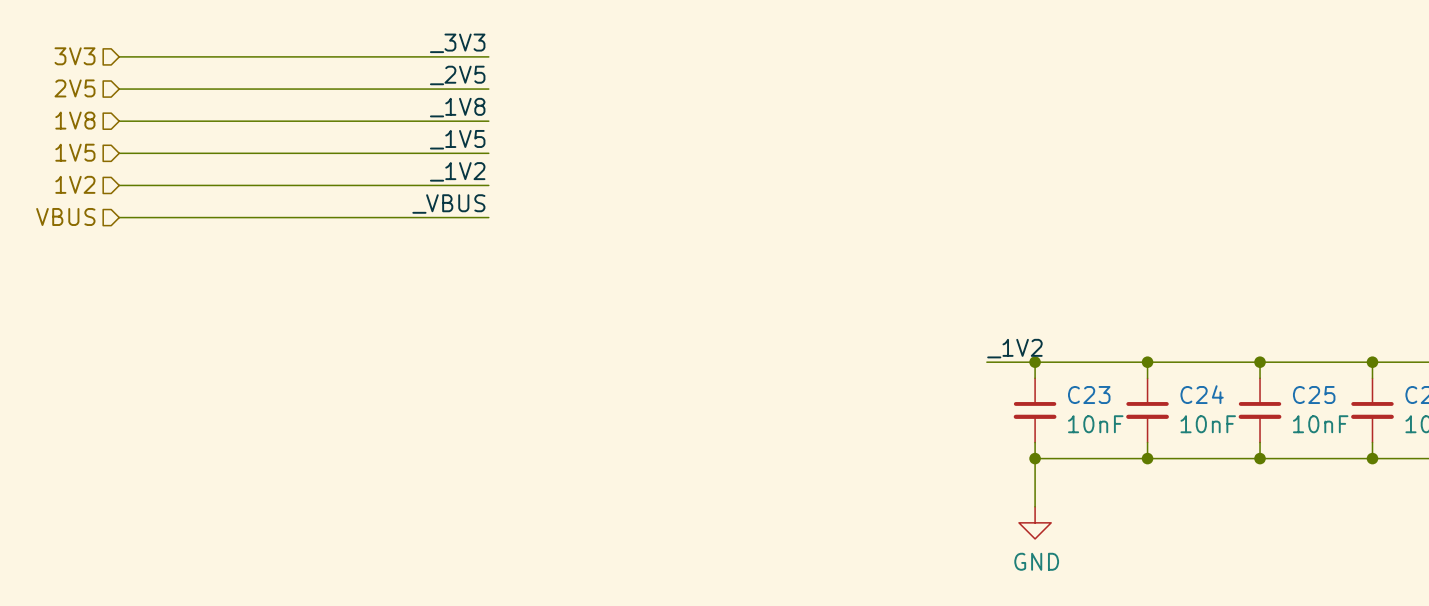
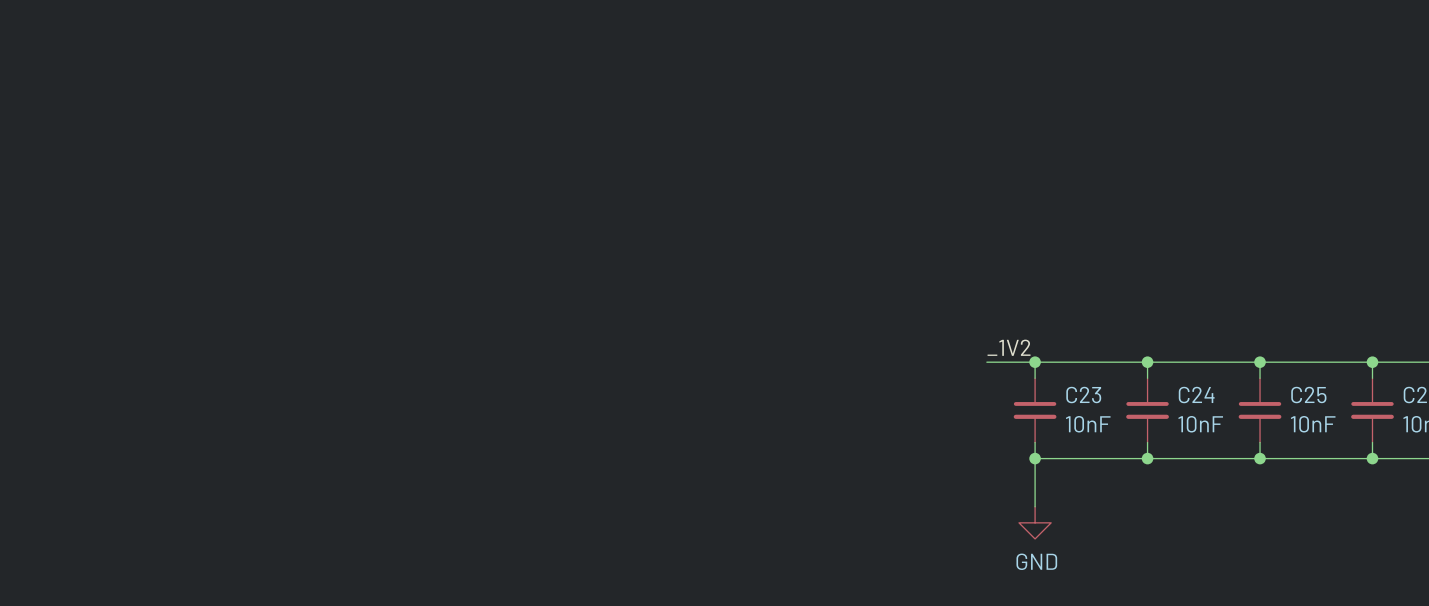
label: _3V3 (457, 43) -> none
hierarchical label: 3V3 (75, 56) -> none
wire: (119, 56) (488, 56) -> none
label: _2V5 (457, 75) -> none
hierarchical label: 2V5 (75, 88) -> none
wire: (119, 89) (488, 89) -> none
label: _1V8 (457, 107) -> none
hierarchical label: 1V8 (75, 120) -> none
wire: (119, 121) (488, 121) -> none
label: _1V5 (457, 139) -> none
hierarchical label: 1V5 (75, 152) -> none
wire: (119, 153) (488, 153) -> none
label: _1V2 (457, 171) -> none
hierarchical label: 1V2 (75, 184) -> none
wire: (119, 185) (488, 185) -> none
label: _VBUS (448, 204) -> none
hierarchical label: VBUS (65, 216) -> none
wire: (119, 217) (488, 217) -> none

